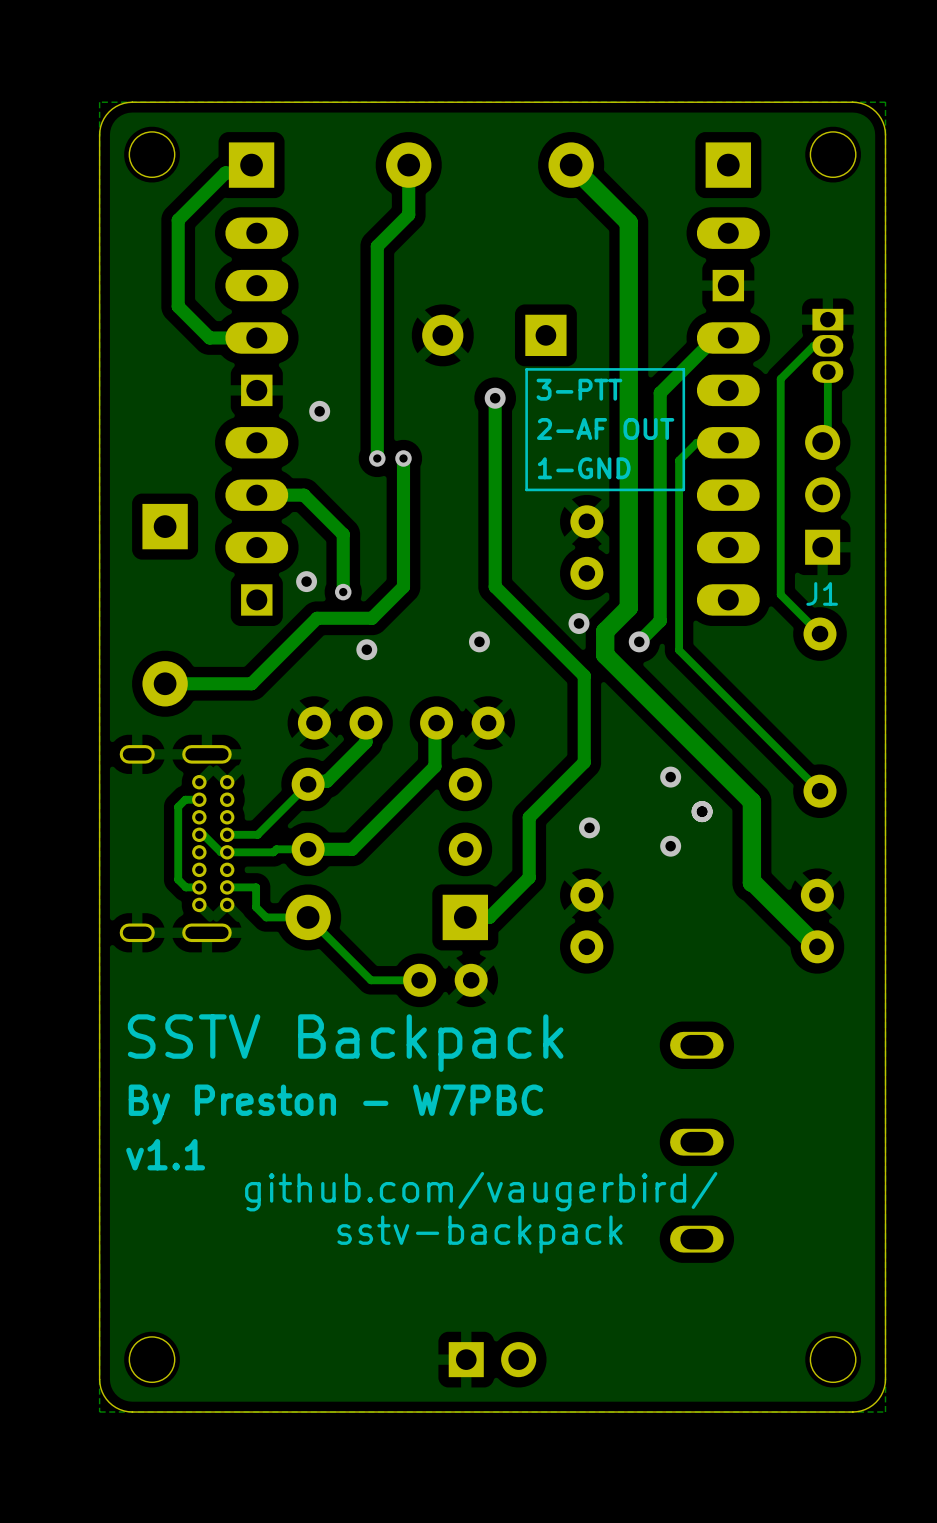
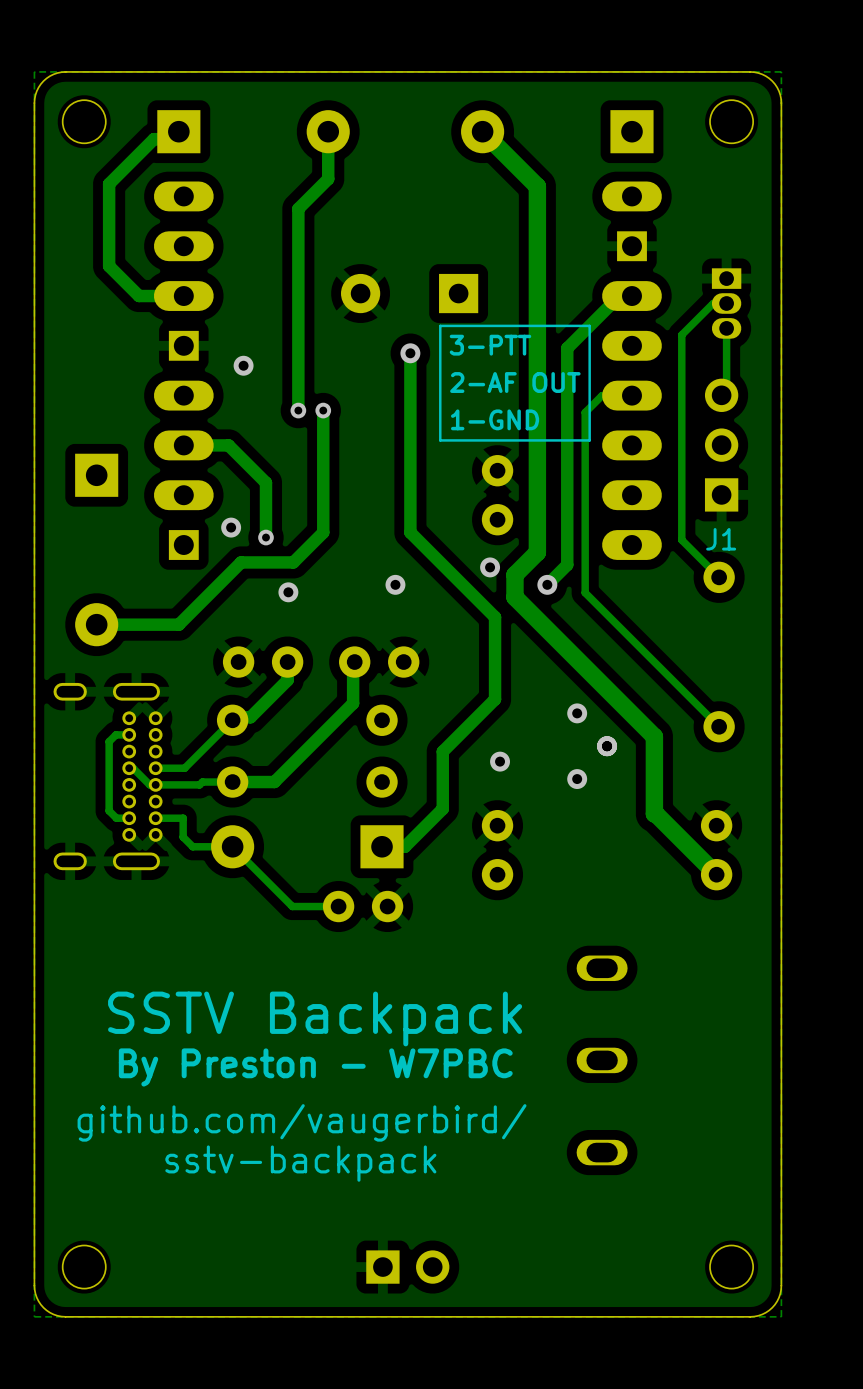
text position: SSTV Backpack (345, 1043) -> SSTV Backpack (315, 1018)
text position: By Preston - W7PBC (335, 1104) -> By Preston - W7PBC (315, 1067)
text: v1.1 (165, 1154) -> none
text position: github.com/vaugerbird/ (481, 1191) -> github.com/vaugerbird/ (302, 1122)
text position: sstv-backpack (479, 1234) -> sstv-backpack (300, 1163)

